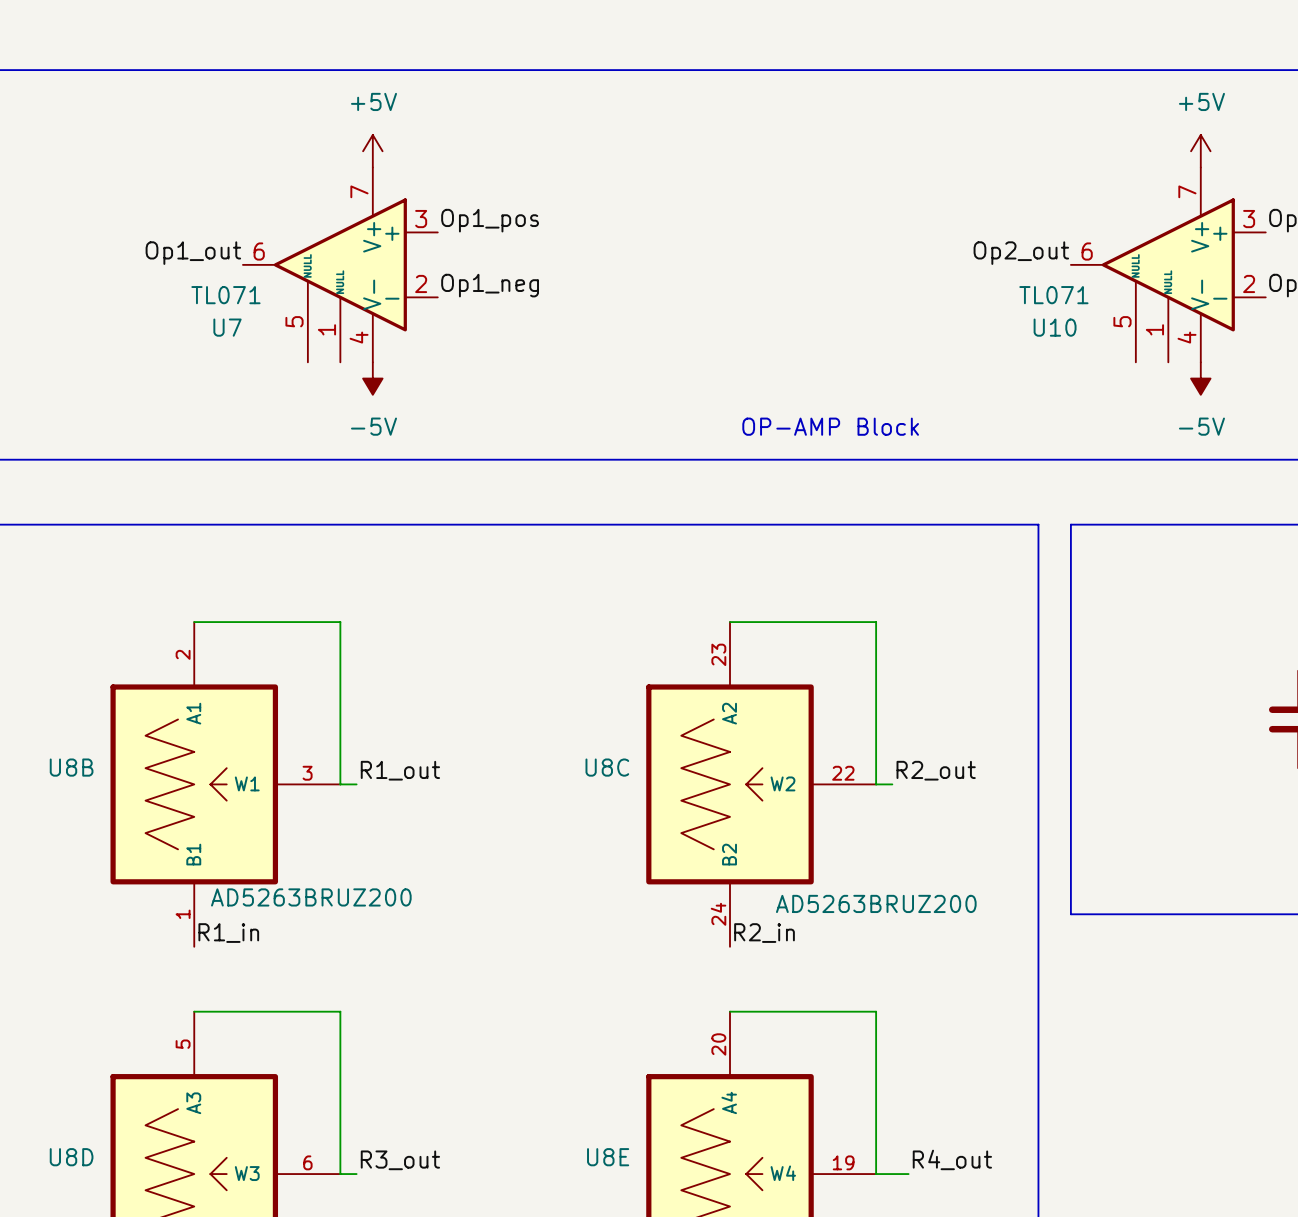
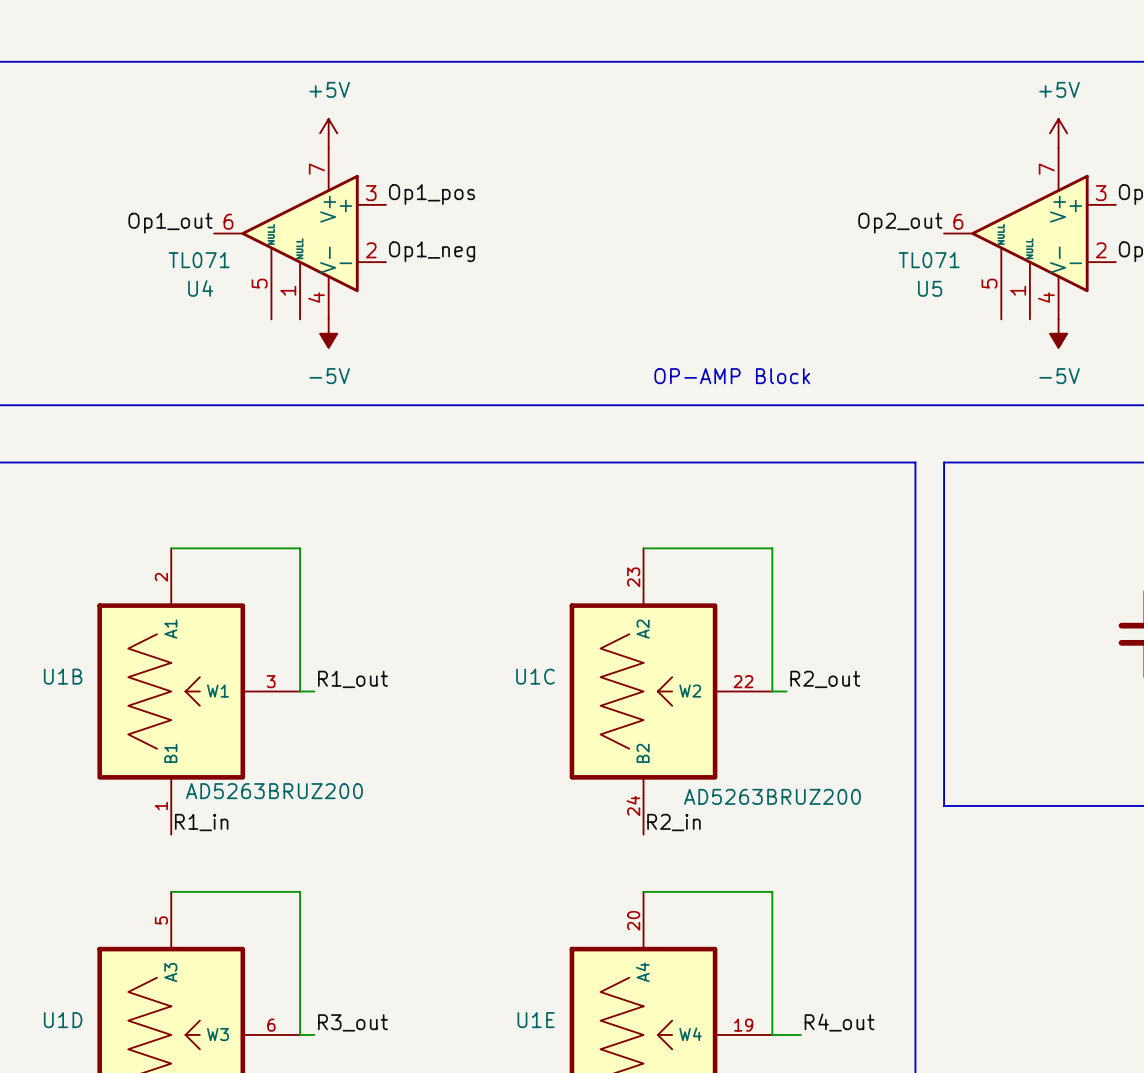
U7 name: U7 (227, 327) -> U4 (200, 288)
U10 name: U10 (1055, 327) -> U5 (930, 288)
U8B name: U8B (71, 767) -> U1B (63, 676)
U8C name: U8C (607, 767) -> U1C (535, 676)
U8D name: U8D (71, 1157) -> U1D (63, 1020)
U8E name: U8E (608, 1157) -> U1E (536, 1020)

